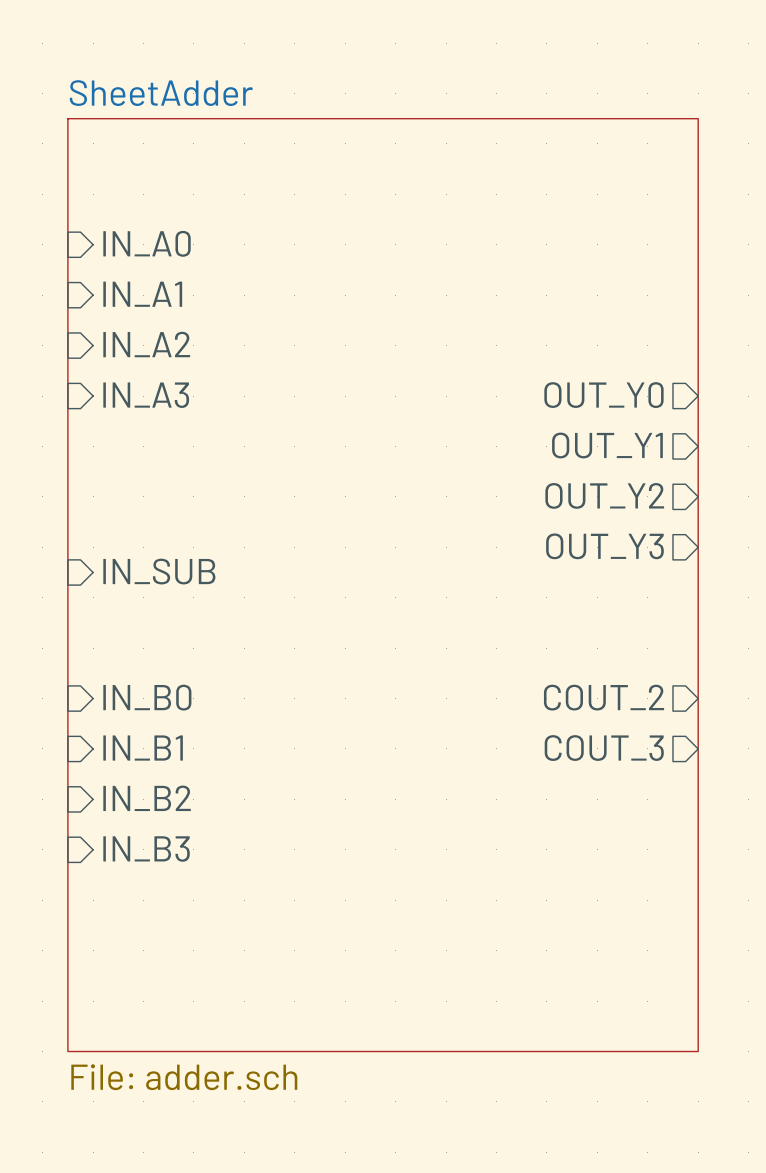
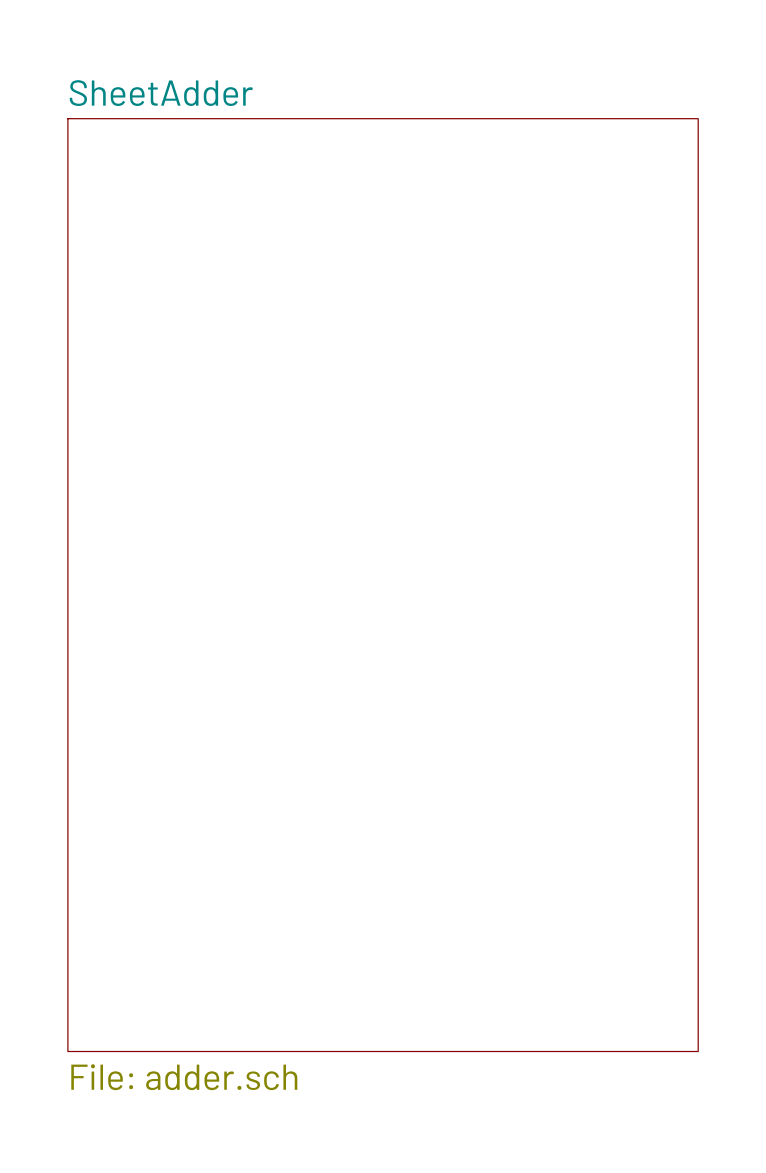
sheet pin: IN_A0 (147, 243) -> none
sheet pin: IN_A1 (142, 294) -> none
sheet pin: IN_A2 (146, 344) -> none
sheet pin: IN_A3 (146, 395) -> none
sheet pin: OUT_Y0 (603, 395) -> none
sheet pin: OUT_Y1 (607, 445) -> none
sheet pin: OUT_Y2 (604, 495) -> none
sheet pin: OUT_Y3 (604, 546) -> none
sheet pin: IN_SUB (159, 571) -> none
sheet pin: IN_B0 (147, 697) -> none
sheet pin: COUT_2 (604, 697) -> none
sheet pin: IN_B1 (143, 748) -> none
sheet pin: COUT_3 (604, 748) -> none
sheet pin: IN_B2 (147, 798) -> none
sheet pin: IN_B3 (146, 849) -> none

